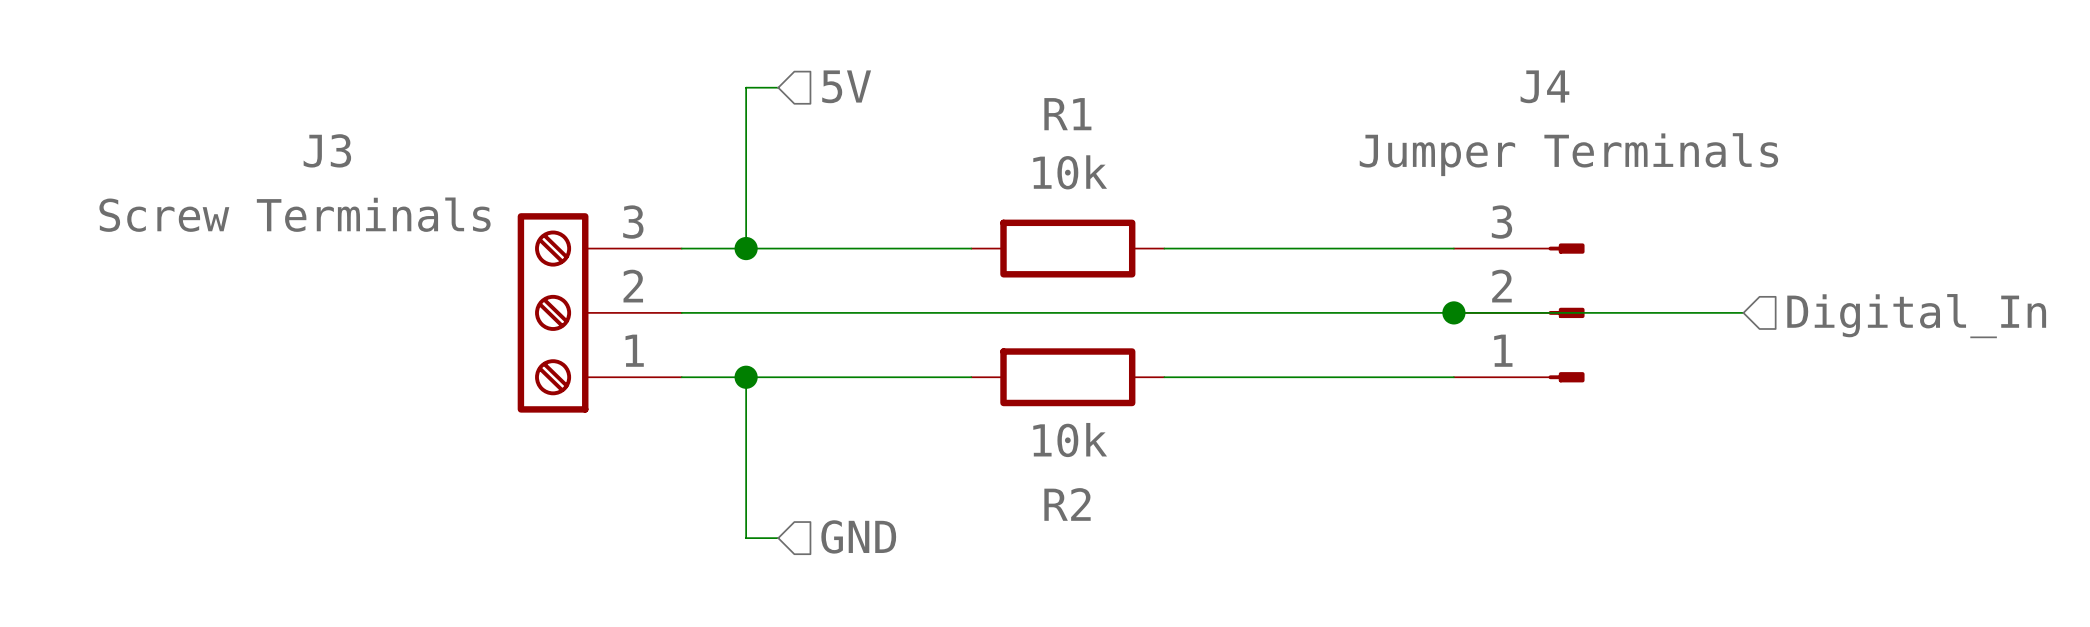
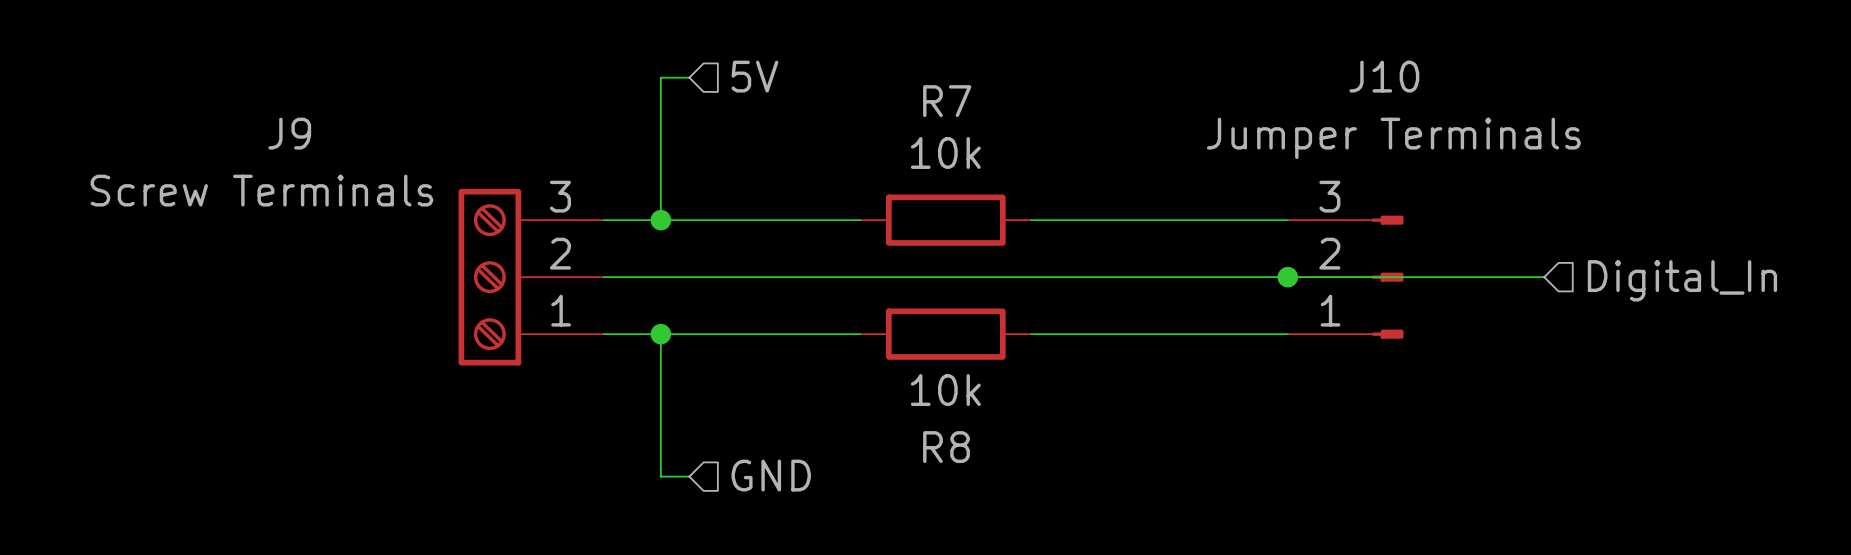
J4 name: J4 (1544, 86) -> J10 (1384, 76)
R1 name: R1 (1067, 114) -> R7 (947, 101)
J3 name: J3 (327, 150) -> J9 (289, 133)
R2 name: R2 (1067, 504) -> R8 (946, 447)

